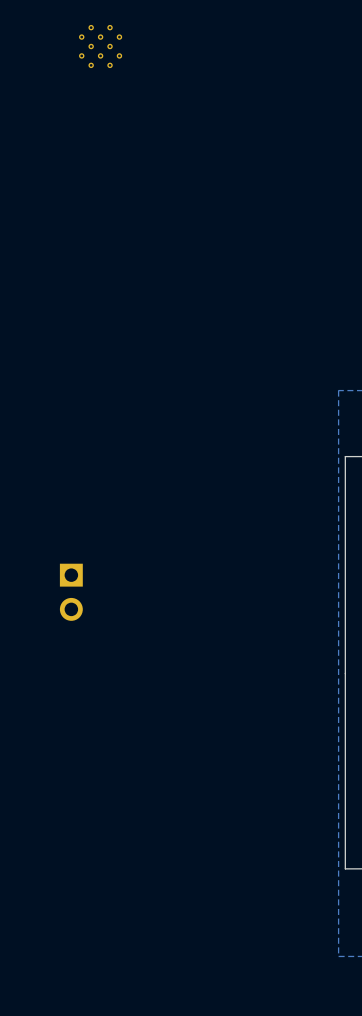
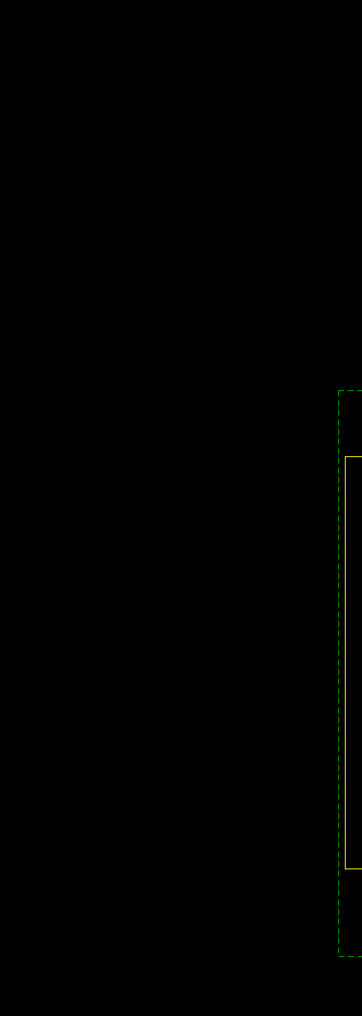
part: (100, 46) -> none
part: (71, 592) -> none

